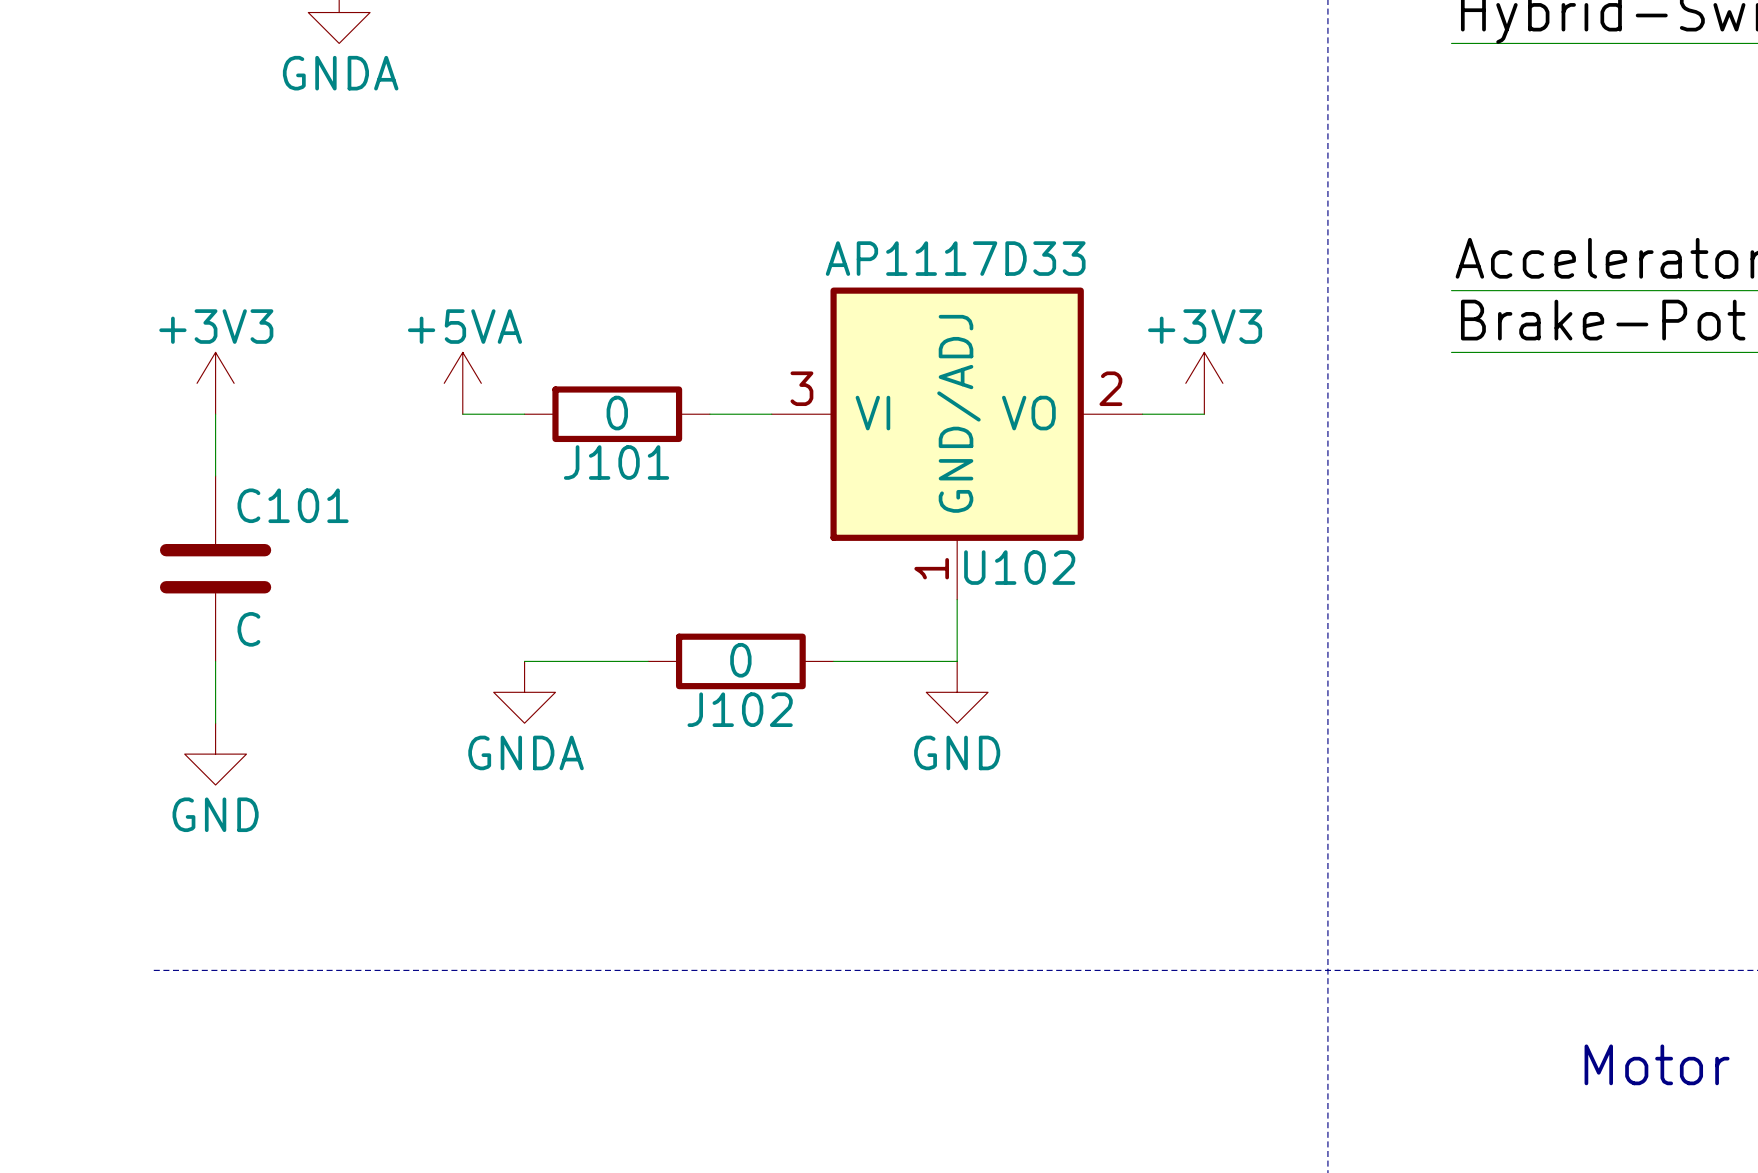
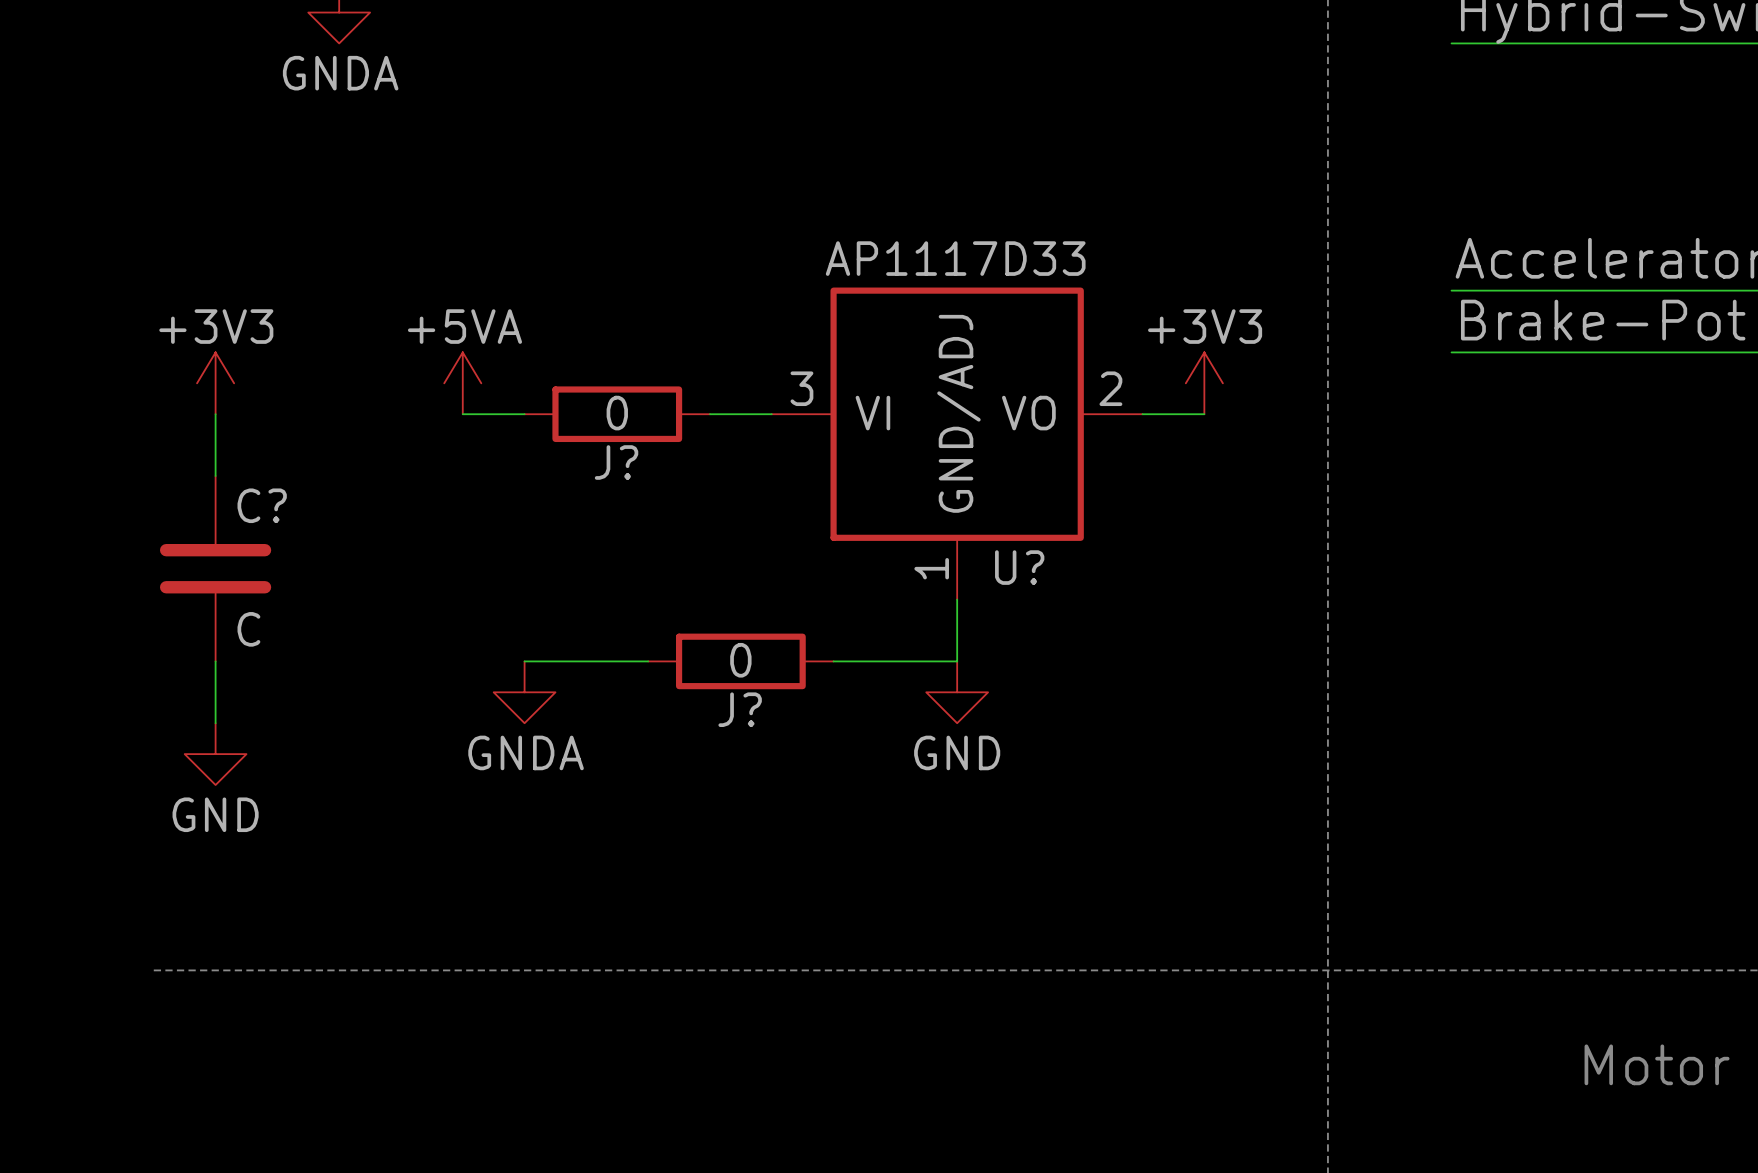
J101 name: J101 (616, 462) -> J? (616, 462)
C101 name: C101 (293, 505) -> C? (262, 505)
U102 name: U102 (1019, 567) -> U? (1019, 567)
J102 name: J102 (740, 709) -> J? (740, 709)

